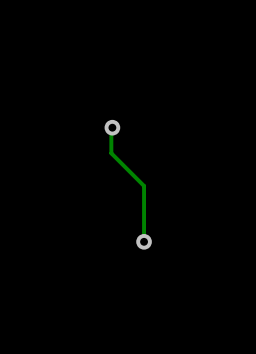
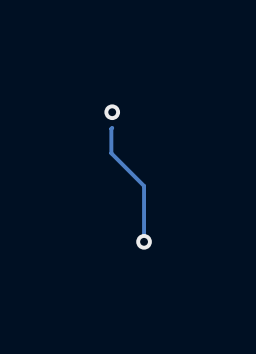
via position: (112, 127) -> (112, 112)

